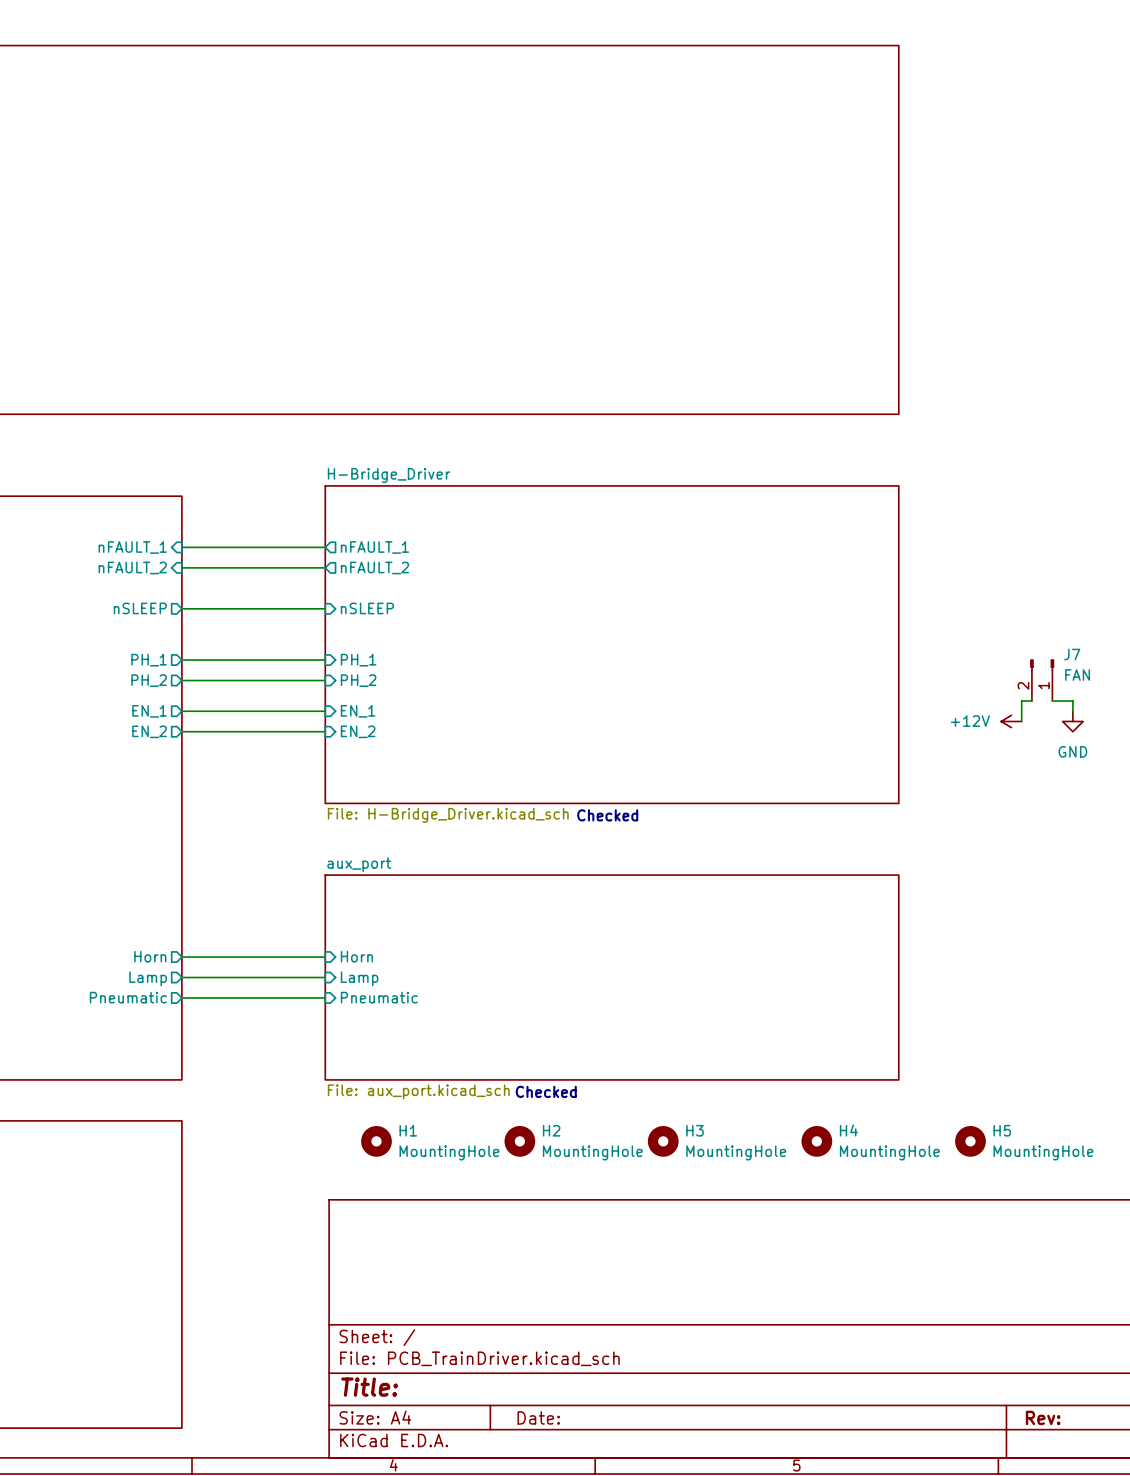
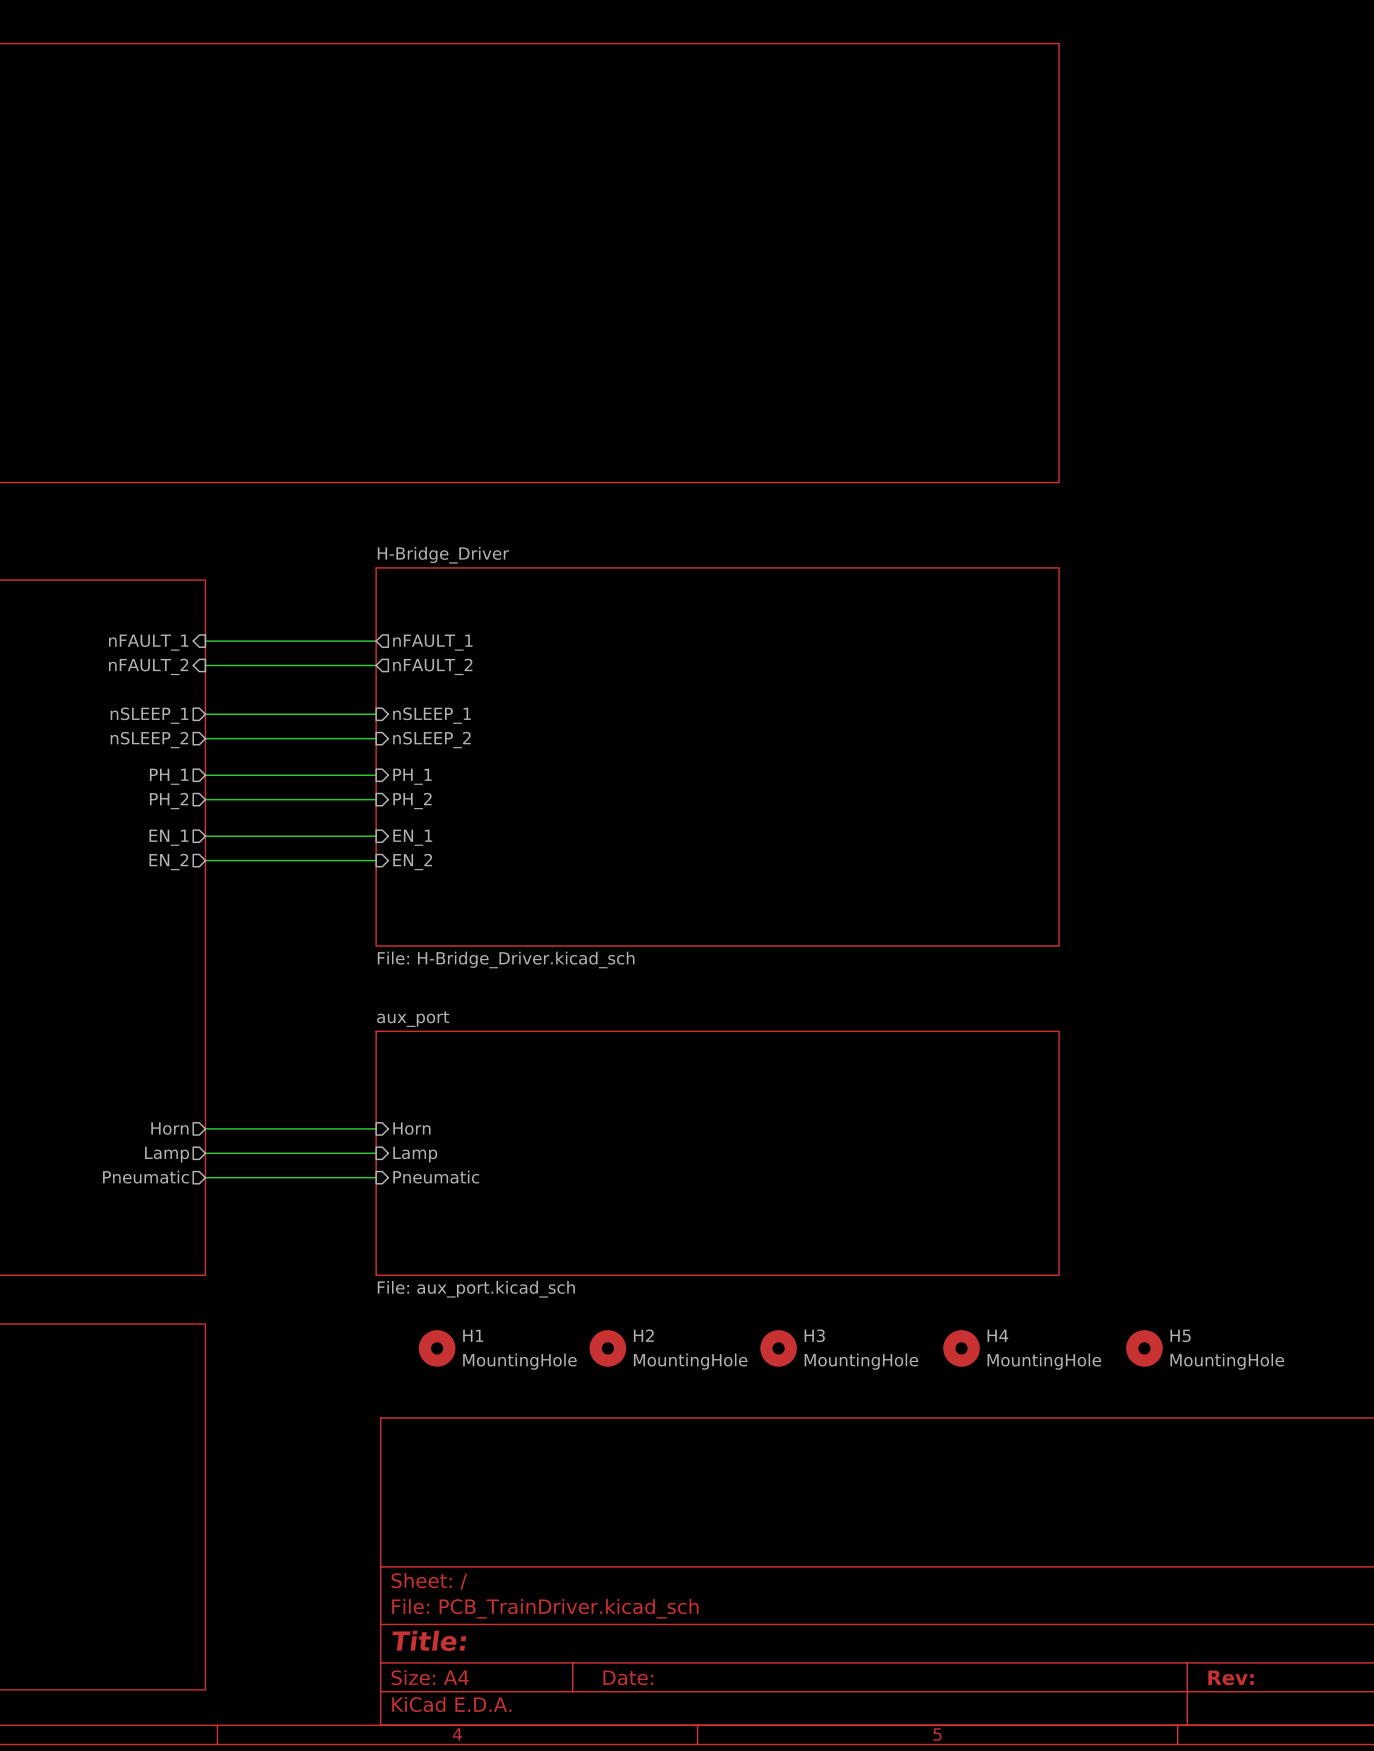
sheet pin: nSLEEP (140, 608) -> nSLEEP_1 (149, 715)
sheet pin: nSLEEP (367, 608) -> nSLEEP_1 (432, 715)
sheet pin: none -> nSLEEP_2 (149, 740)
wire: none -> (205, 738) (376, 738)
sheet pin: none -> nSLEEP_2 (431, 740)
J7: FAN (1042, 680) -> none
wire: (1031, 701) (1021, 701) (1021, 721) -> none
wire: (1052, 701) (1072, 701) (1072, 711) -> none
power symbol: +12V (1011, 721) -> none
power symbol: GND (1072, 721) -> none
text: Checked (607, 815) -> none
text: Checked (546, 1091) -> none

